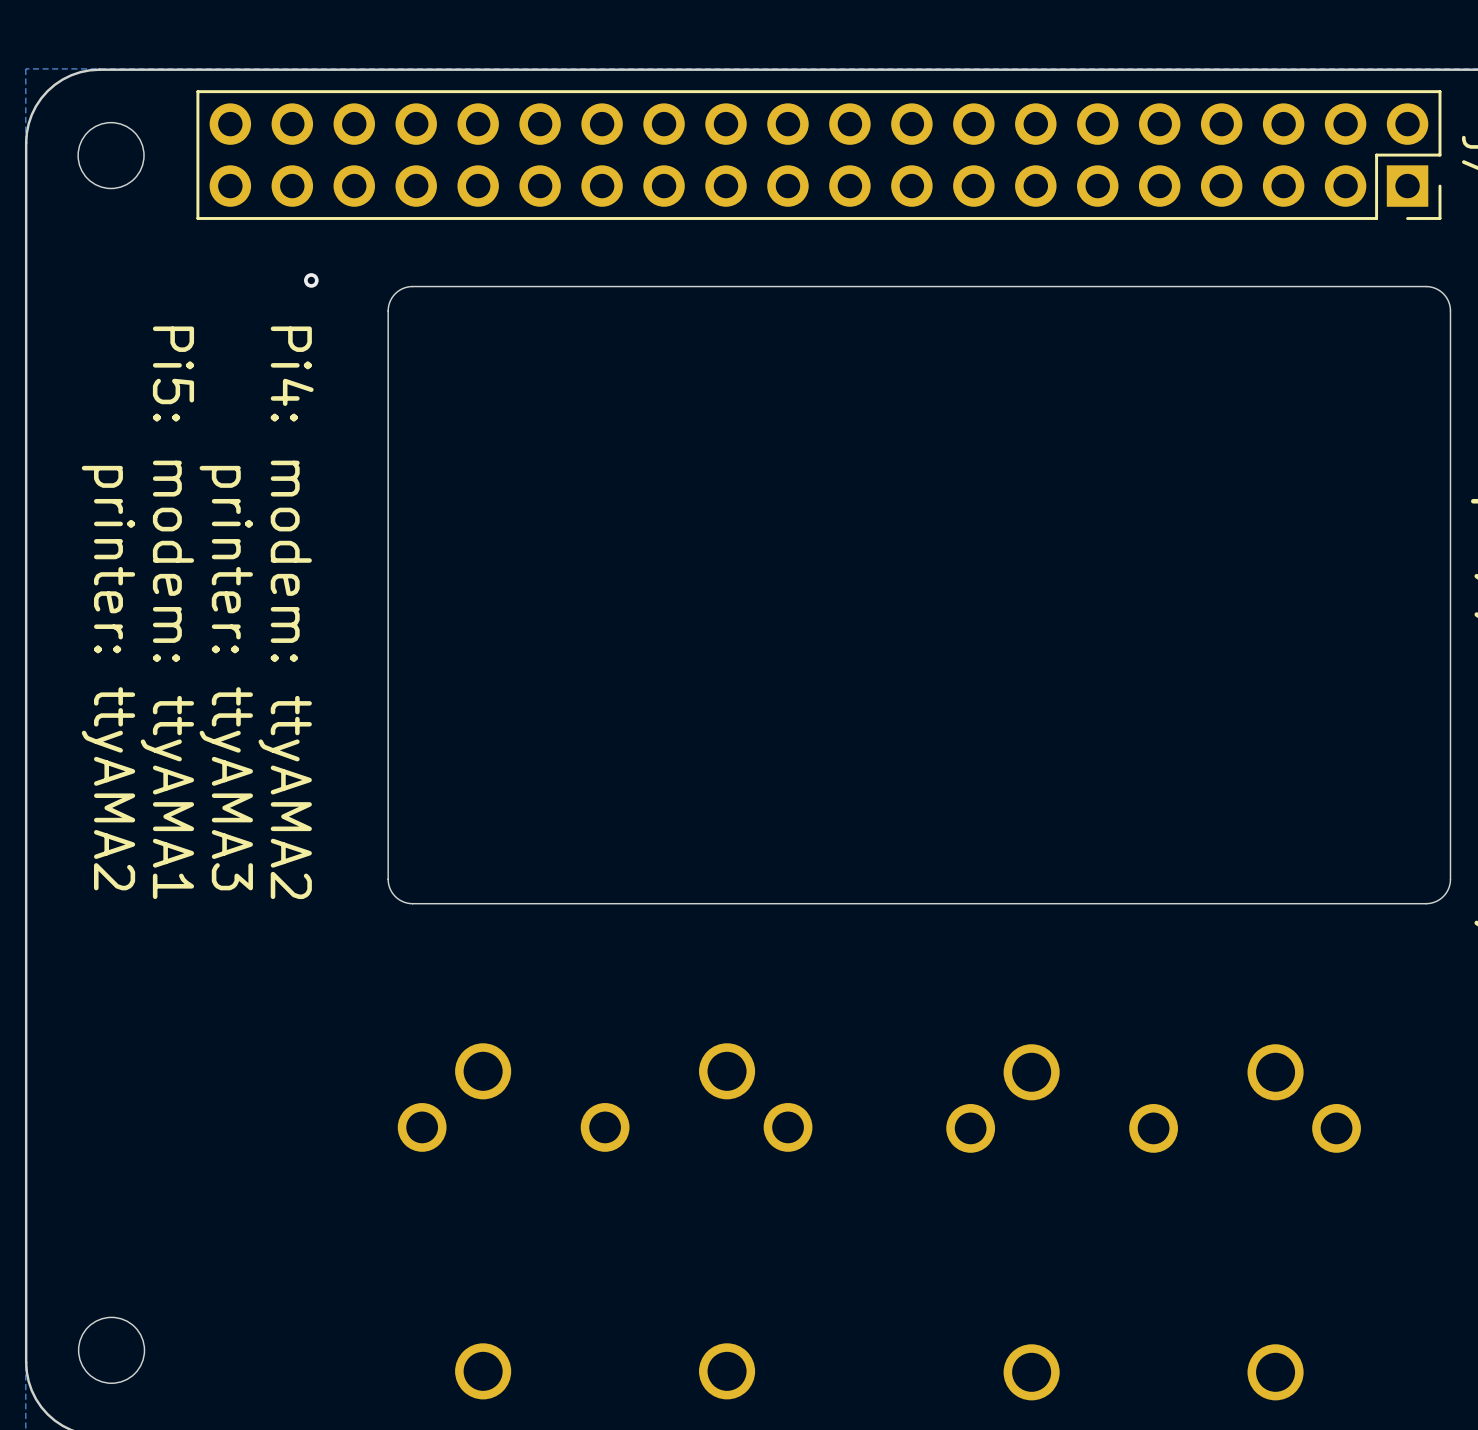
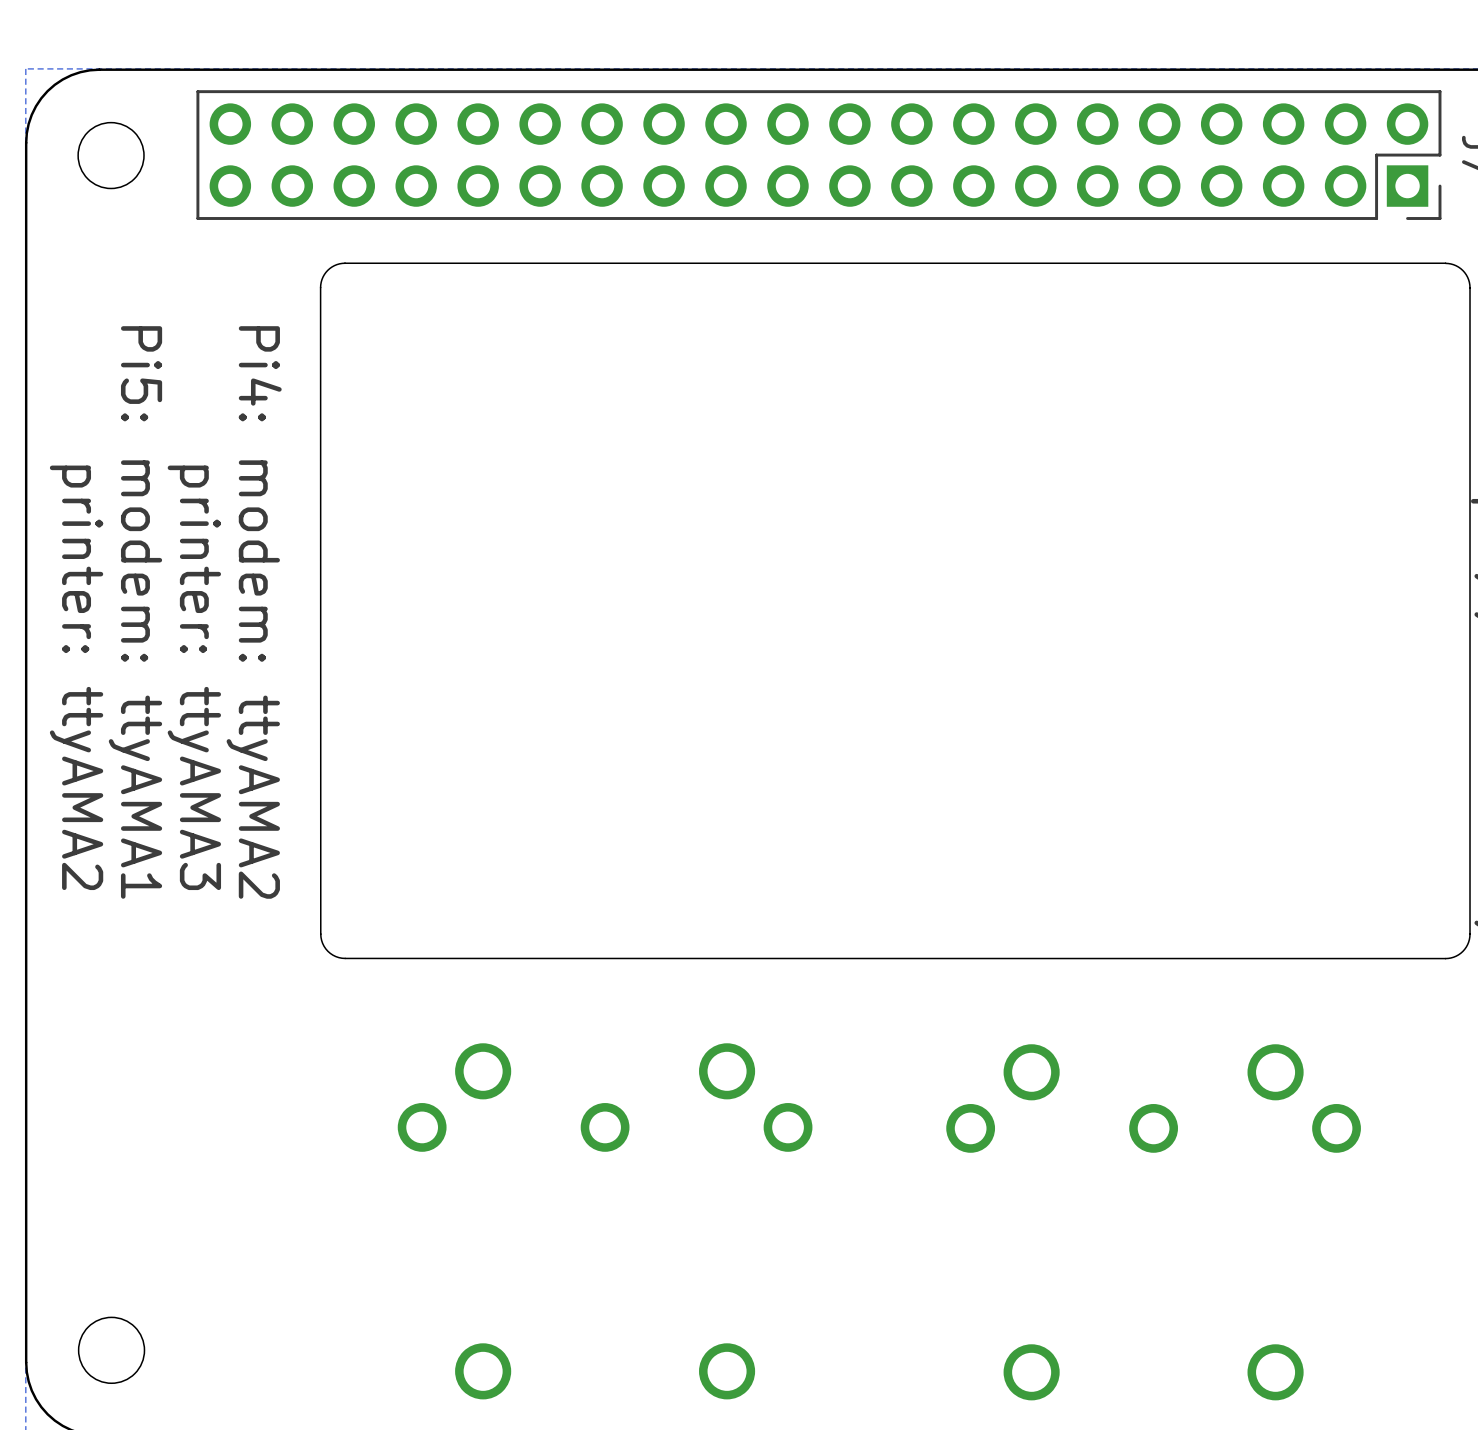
via: (311, 280) -> none
board edge: (1426, 286) (412, 286) (399, 290) (391, 297) (388, 310) (388, 879) (391, 892) (401, 901) (412, 903) (1426, 903) (1439, 899) (1446, 892) (1450, 879) (1450, 310) (1448, 300) (1443, 293) (1434, 287) (1426, 286) -> (1445, 263) (344, 263) (332, 266) (323, 277) (320, 287) (320, 934) (324, 946) (332, 955) (345, 958) (1445, 958) (1458, 954) (1466, 947) (1470, 934) (1470, 287) (1467, 277) (1462, 270) (1456, 265) (1445, 263)
text position: Pi5: modem: ttyAMA1 (167, 612) -> Pi5: modem: ttyAMA1 (135, 612)
text position: Pi4: modem: ttyAMA2 (286, 612) -> Pi4: modem: ttyAMA2 (254, 612)
text position: printer: ttyAMA2 (108, 678) -> printer: ttyAMA2 (76, 677)
text position: printer: ttyAMA3 (226, 678) -> printer: ttyAMA3 (194, 677)

